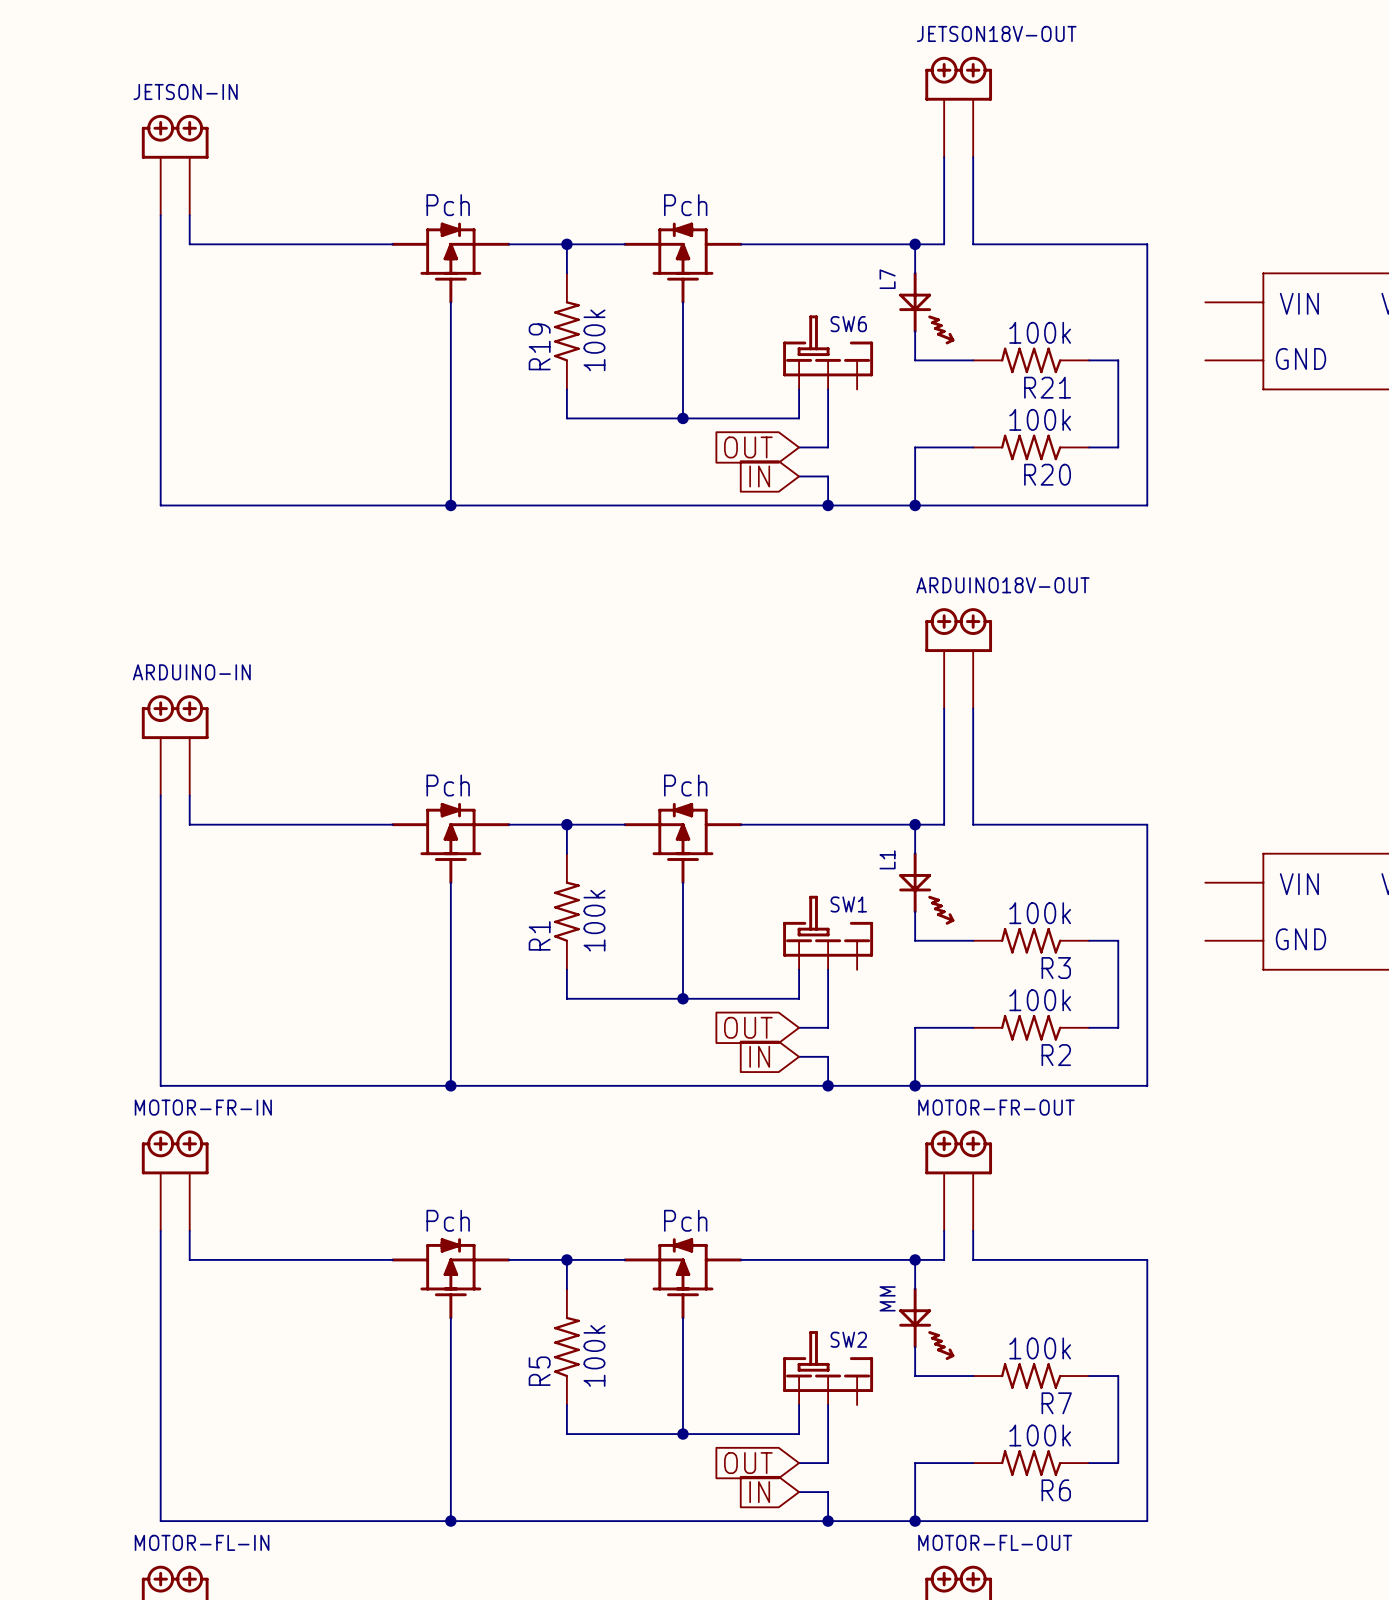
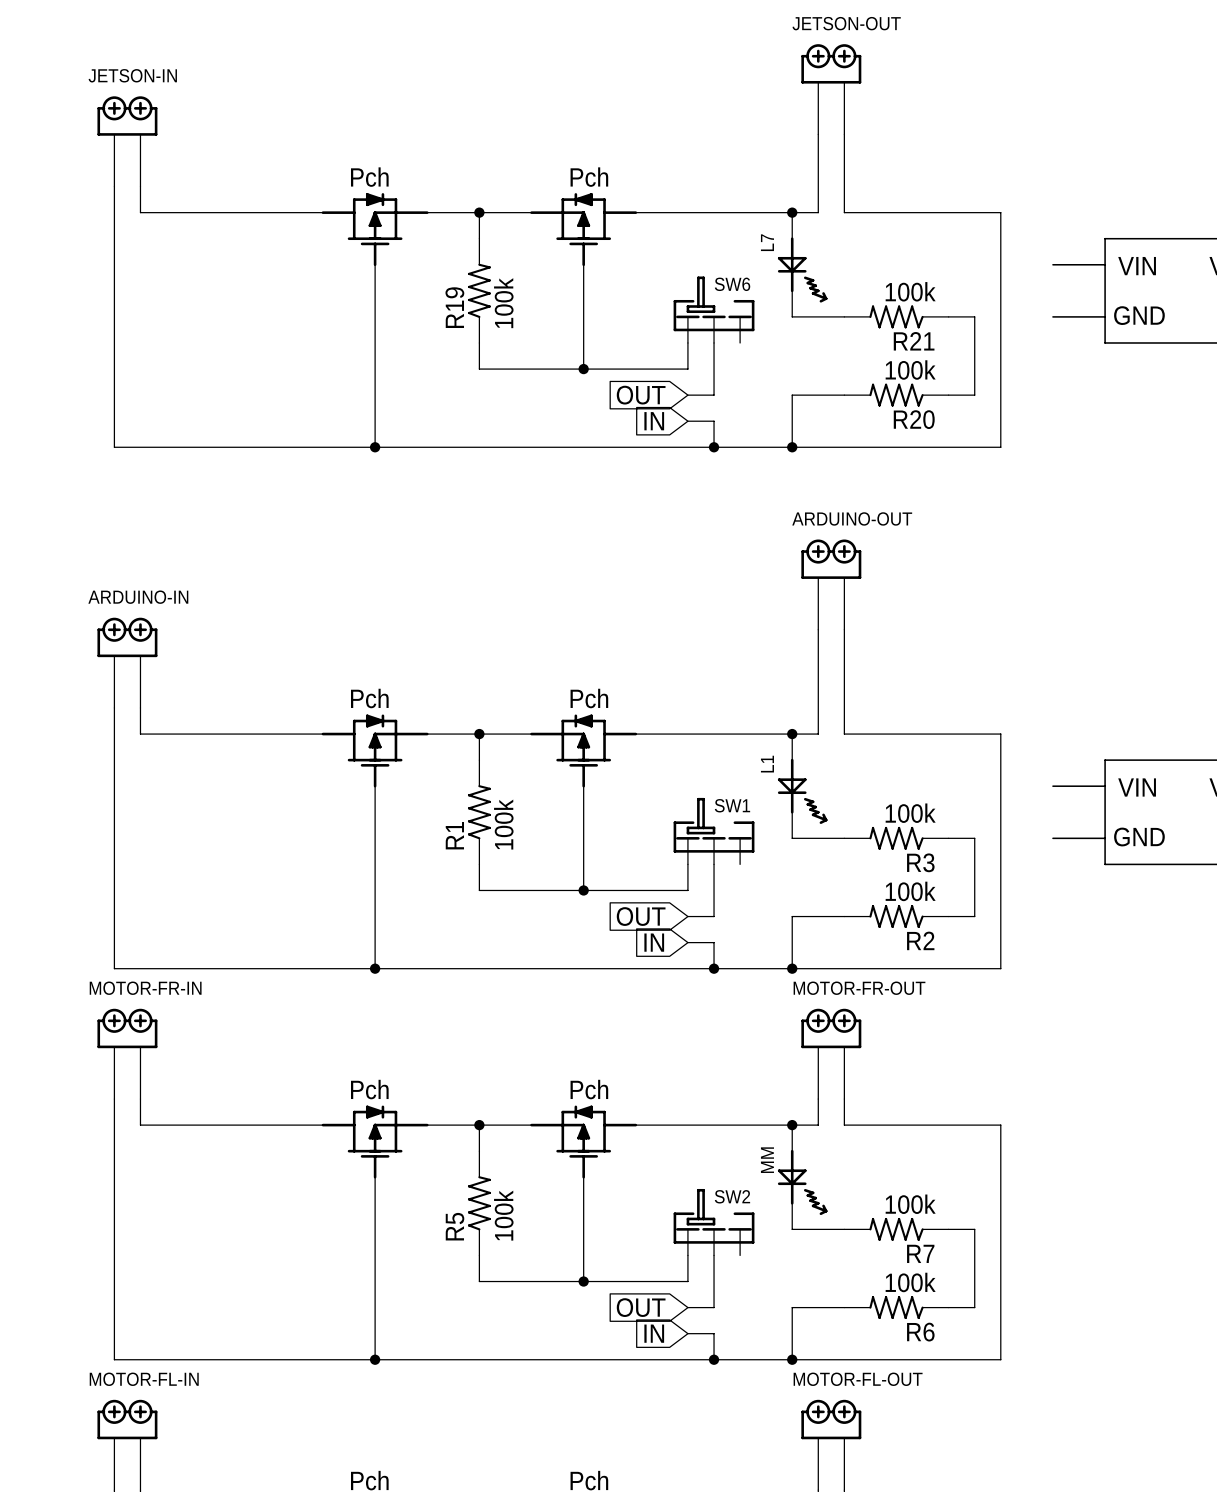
JETSON18V-OUT name: JETSON18V-OUT (996, 33) -> JETSON-OUT (846, 23)
ARDUINO18V-OUT name: ARDUINO18V-OUT (1002, 585) -> ARDUINO-OUT (852, 518)

